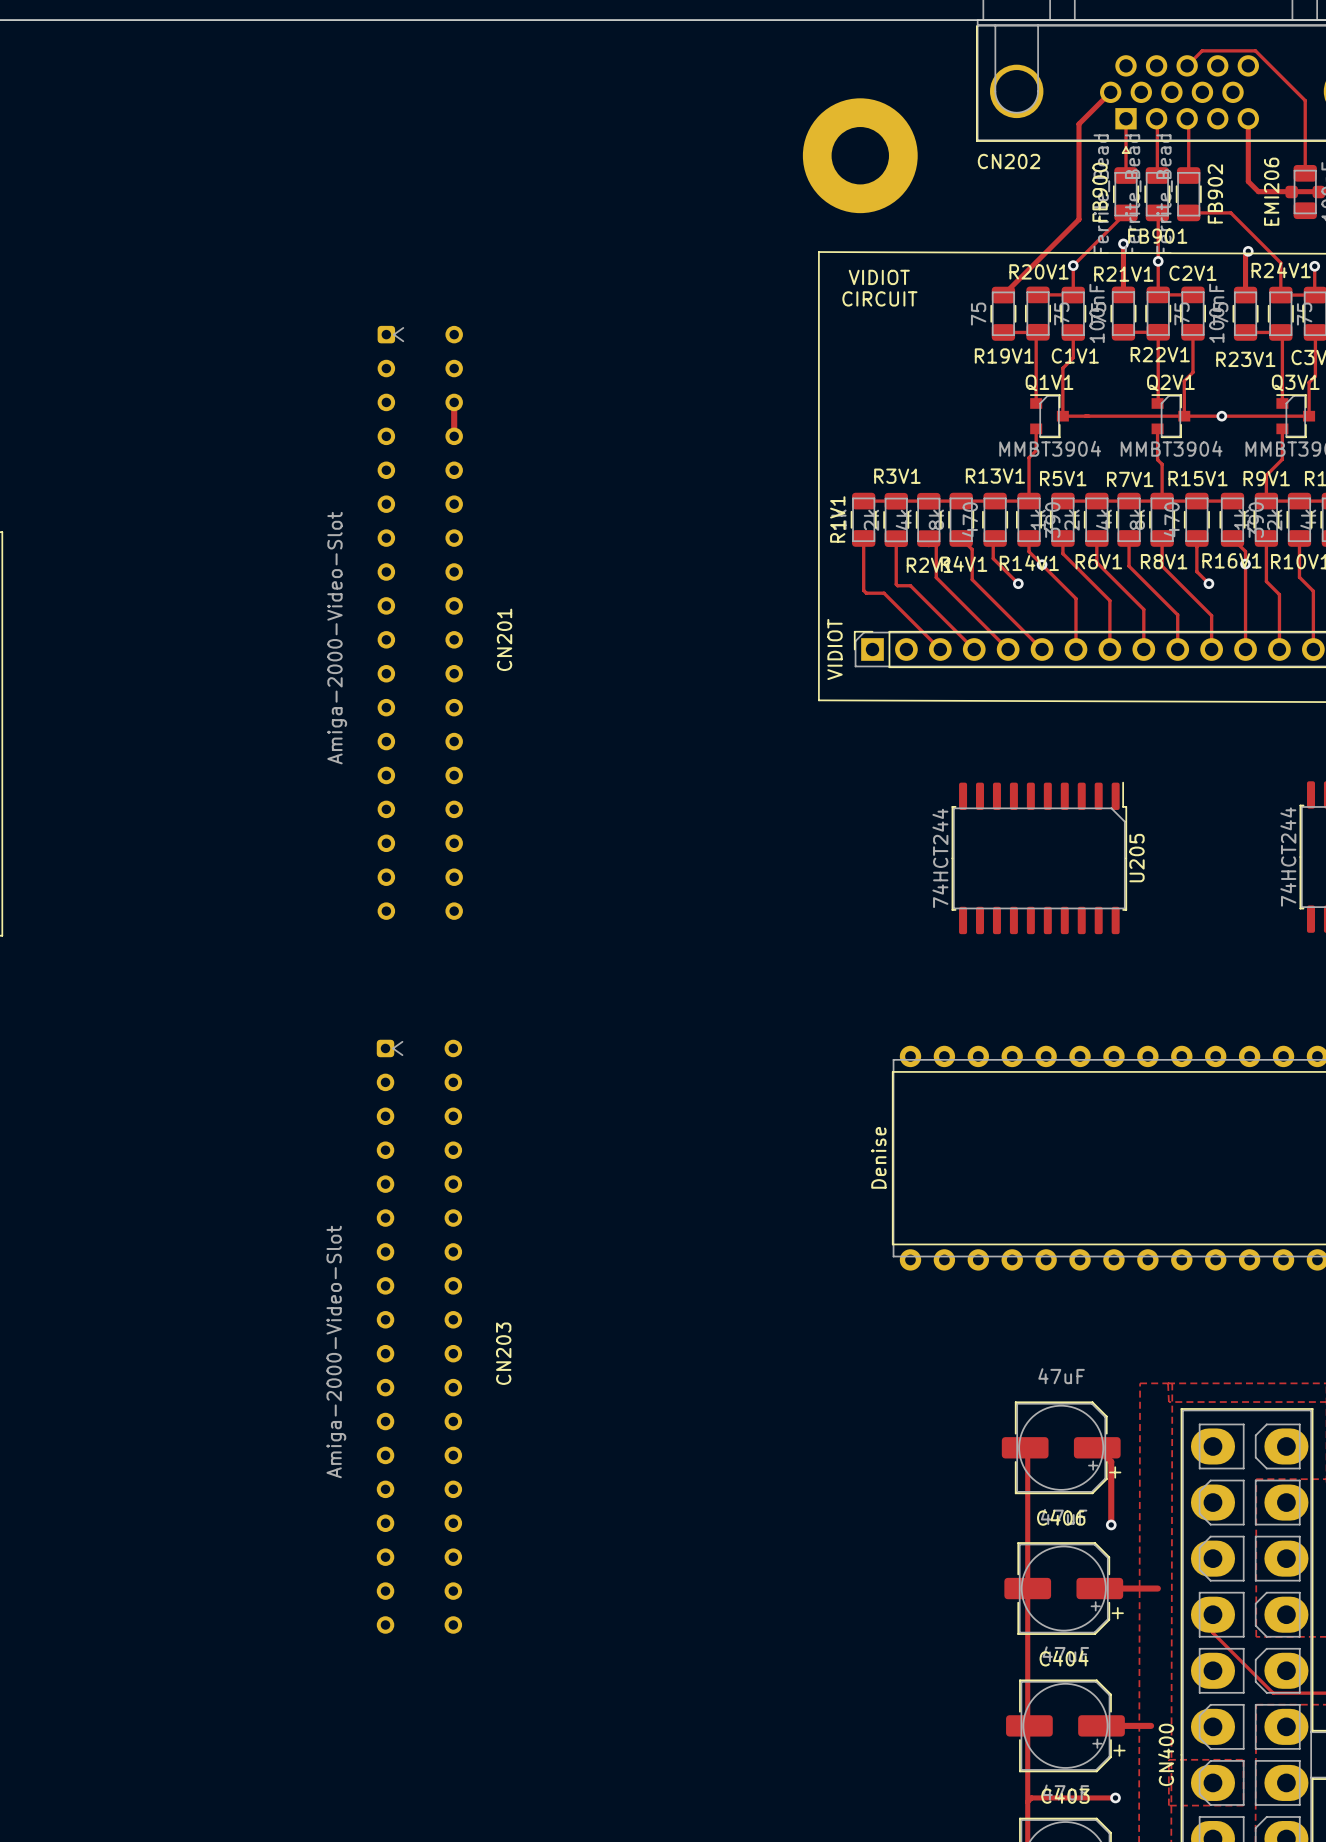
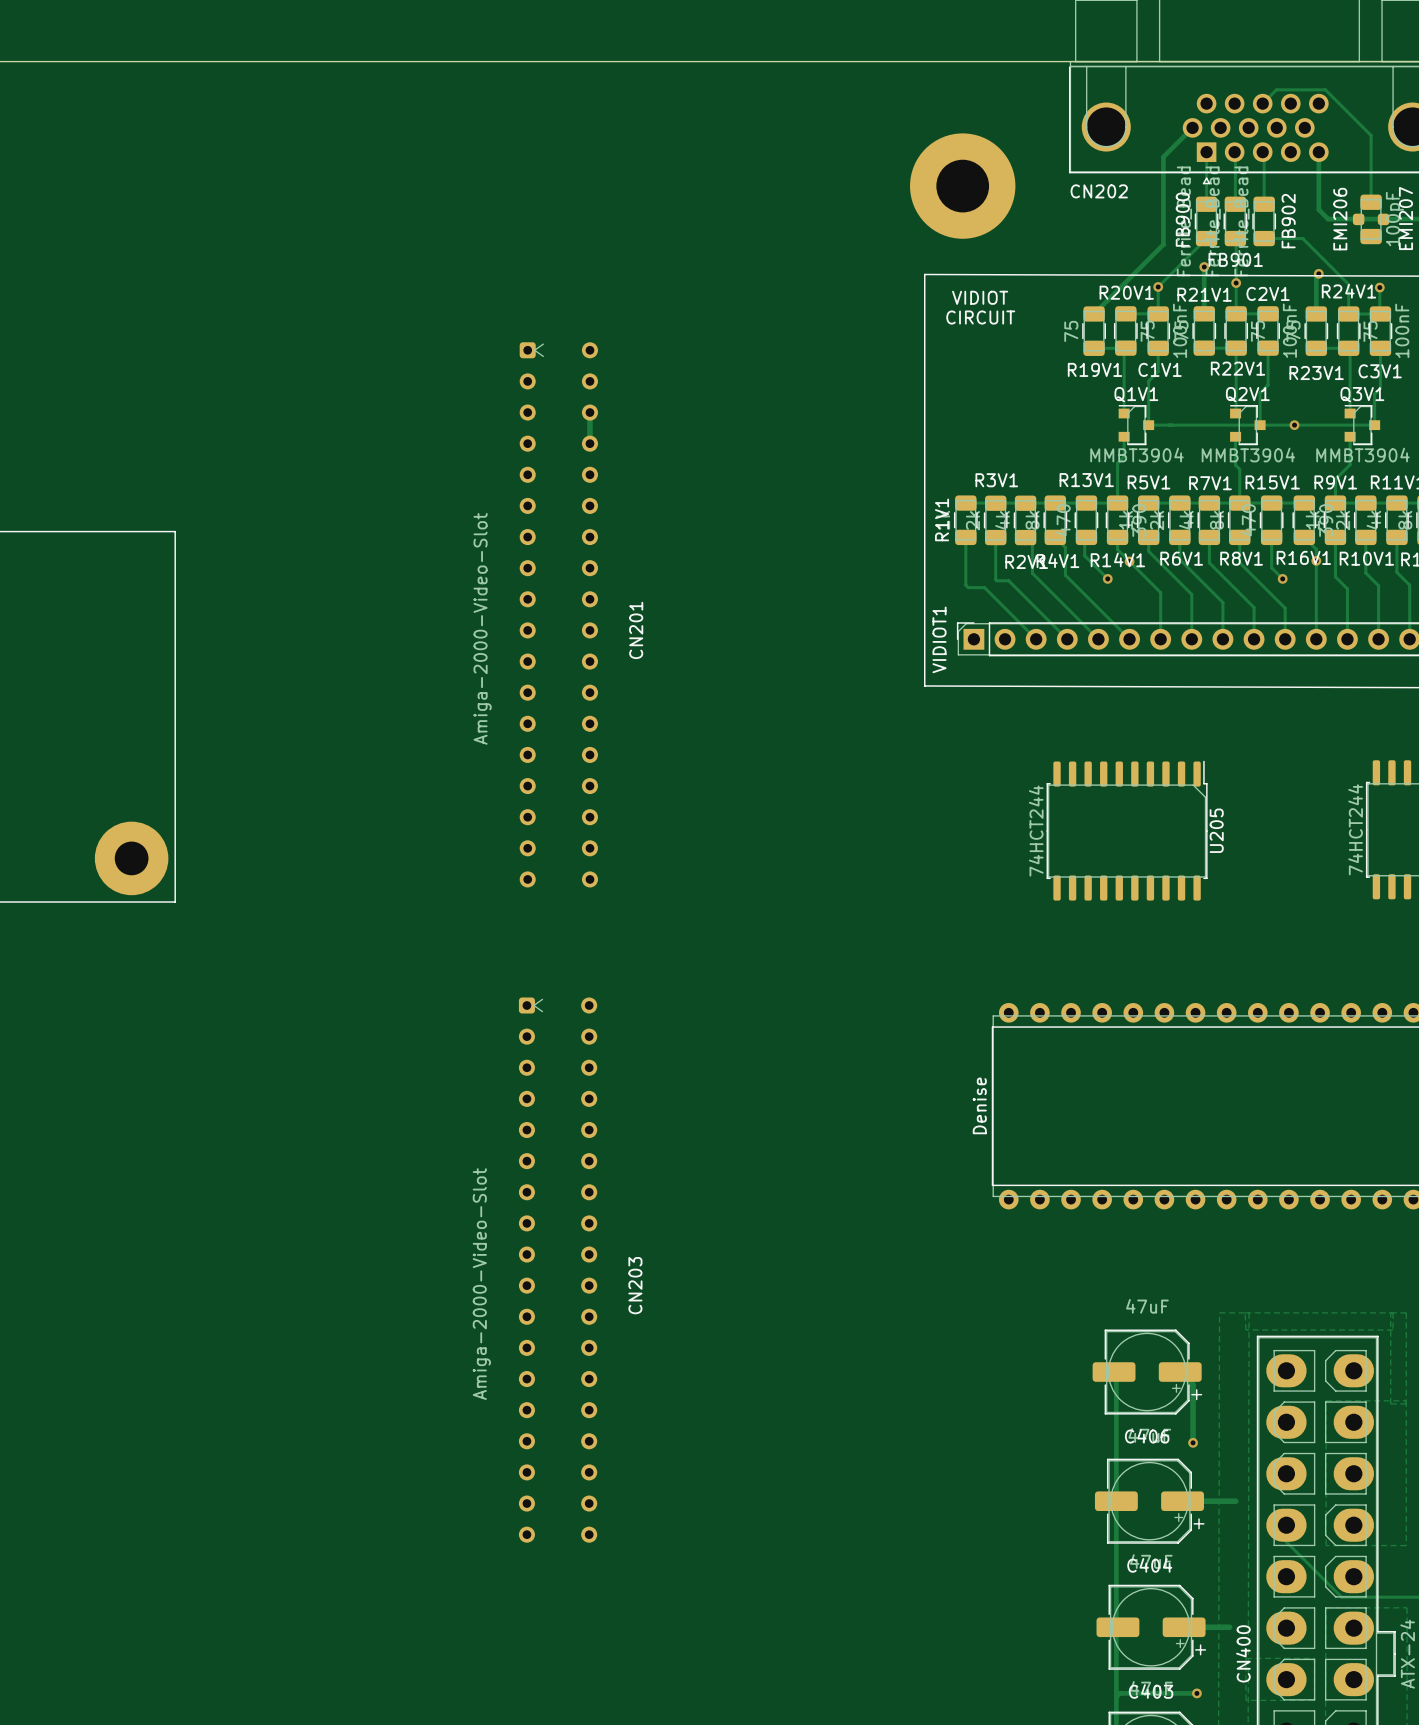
VIDIOT name: VIDIOT (835, 649) -> VIDIOT1 (939, 639)

